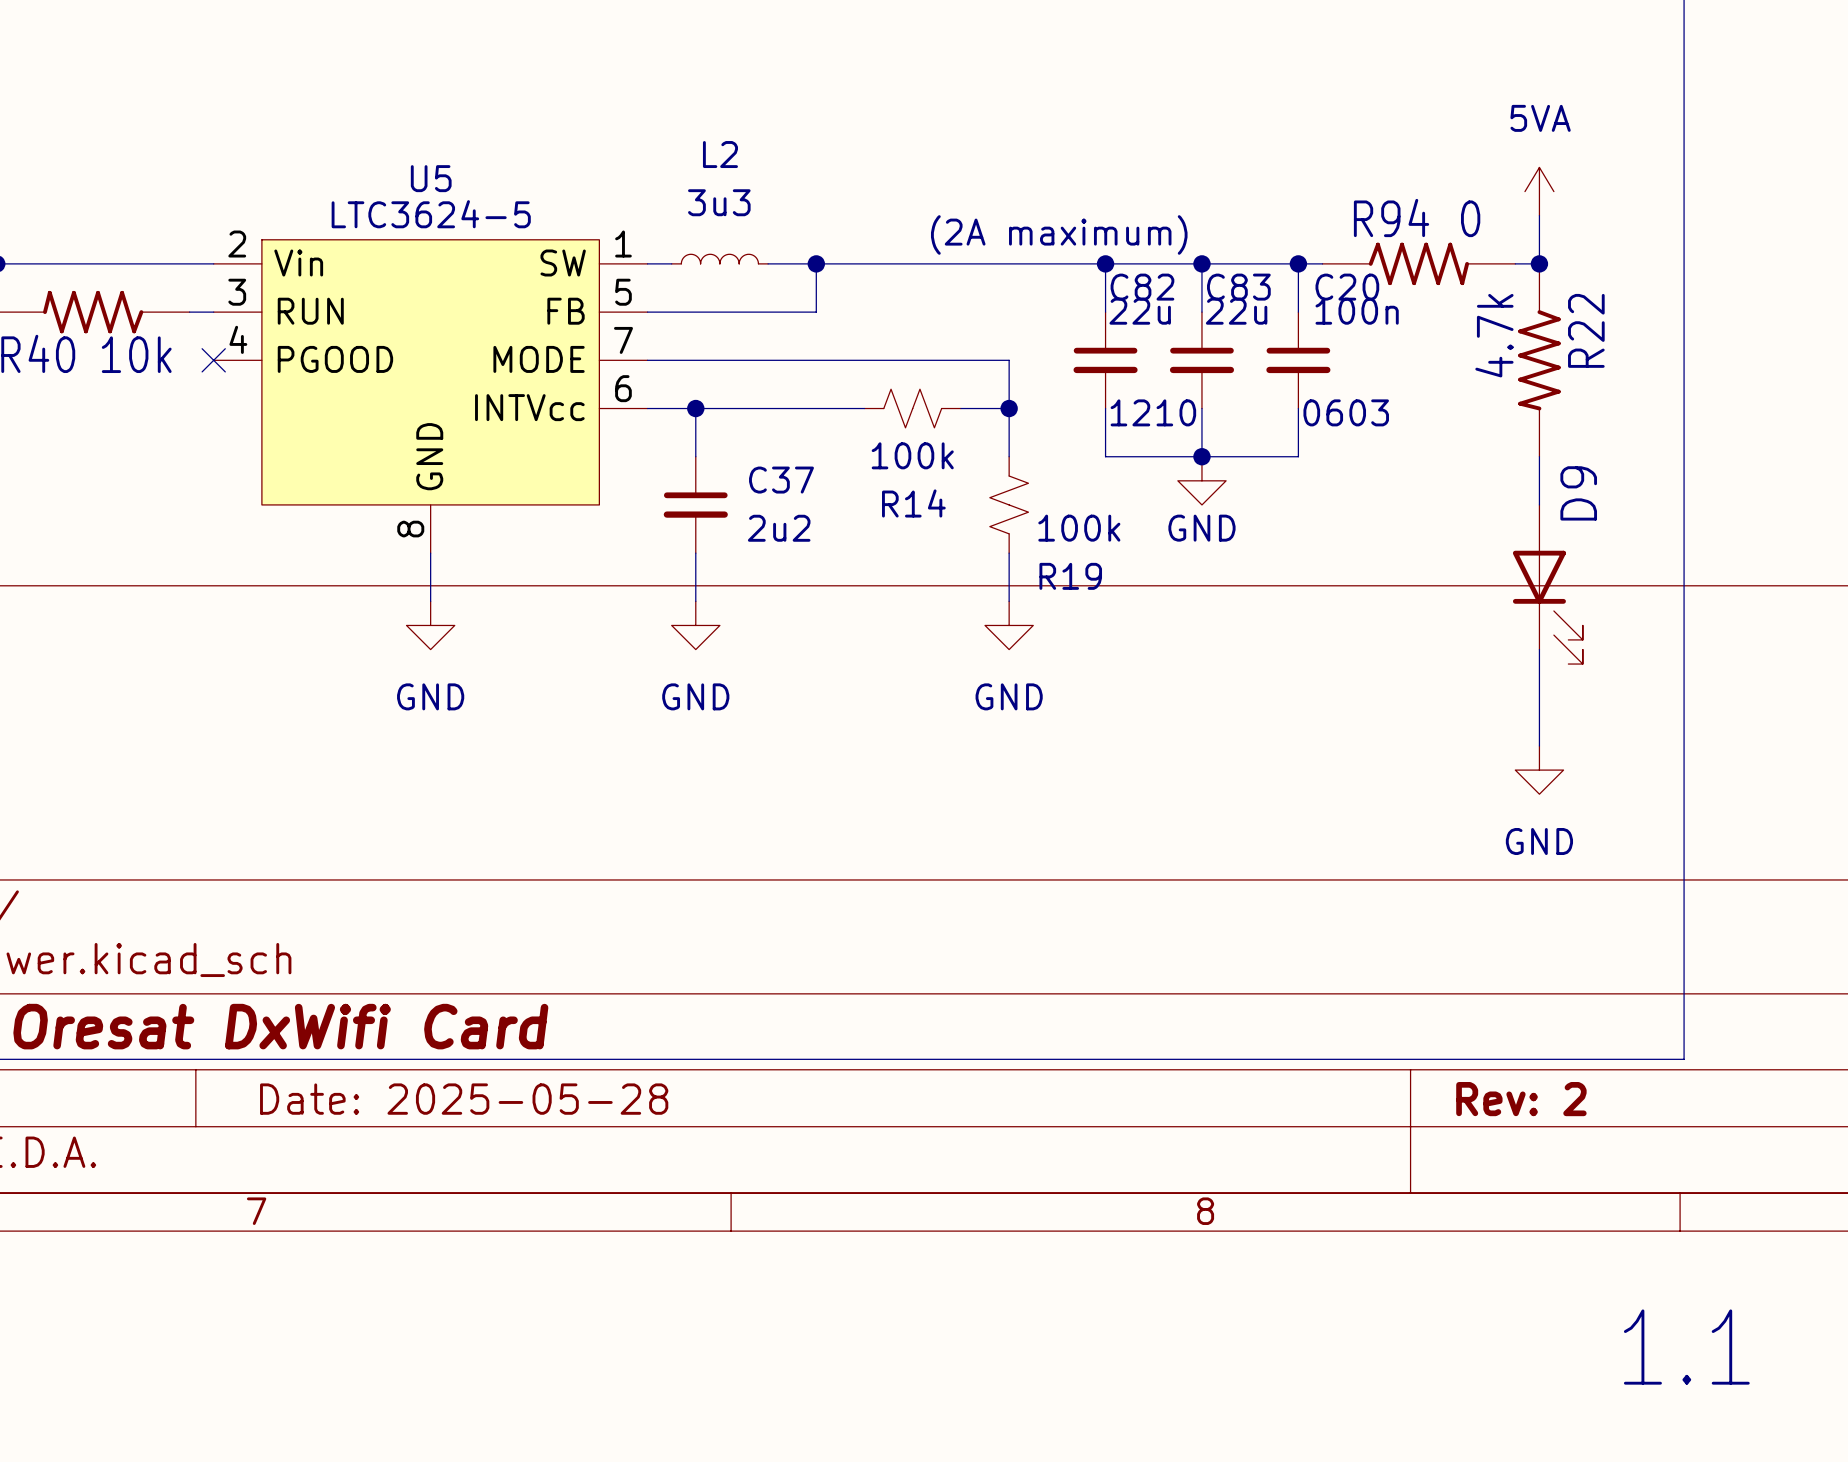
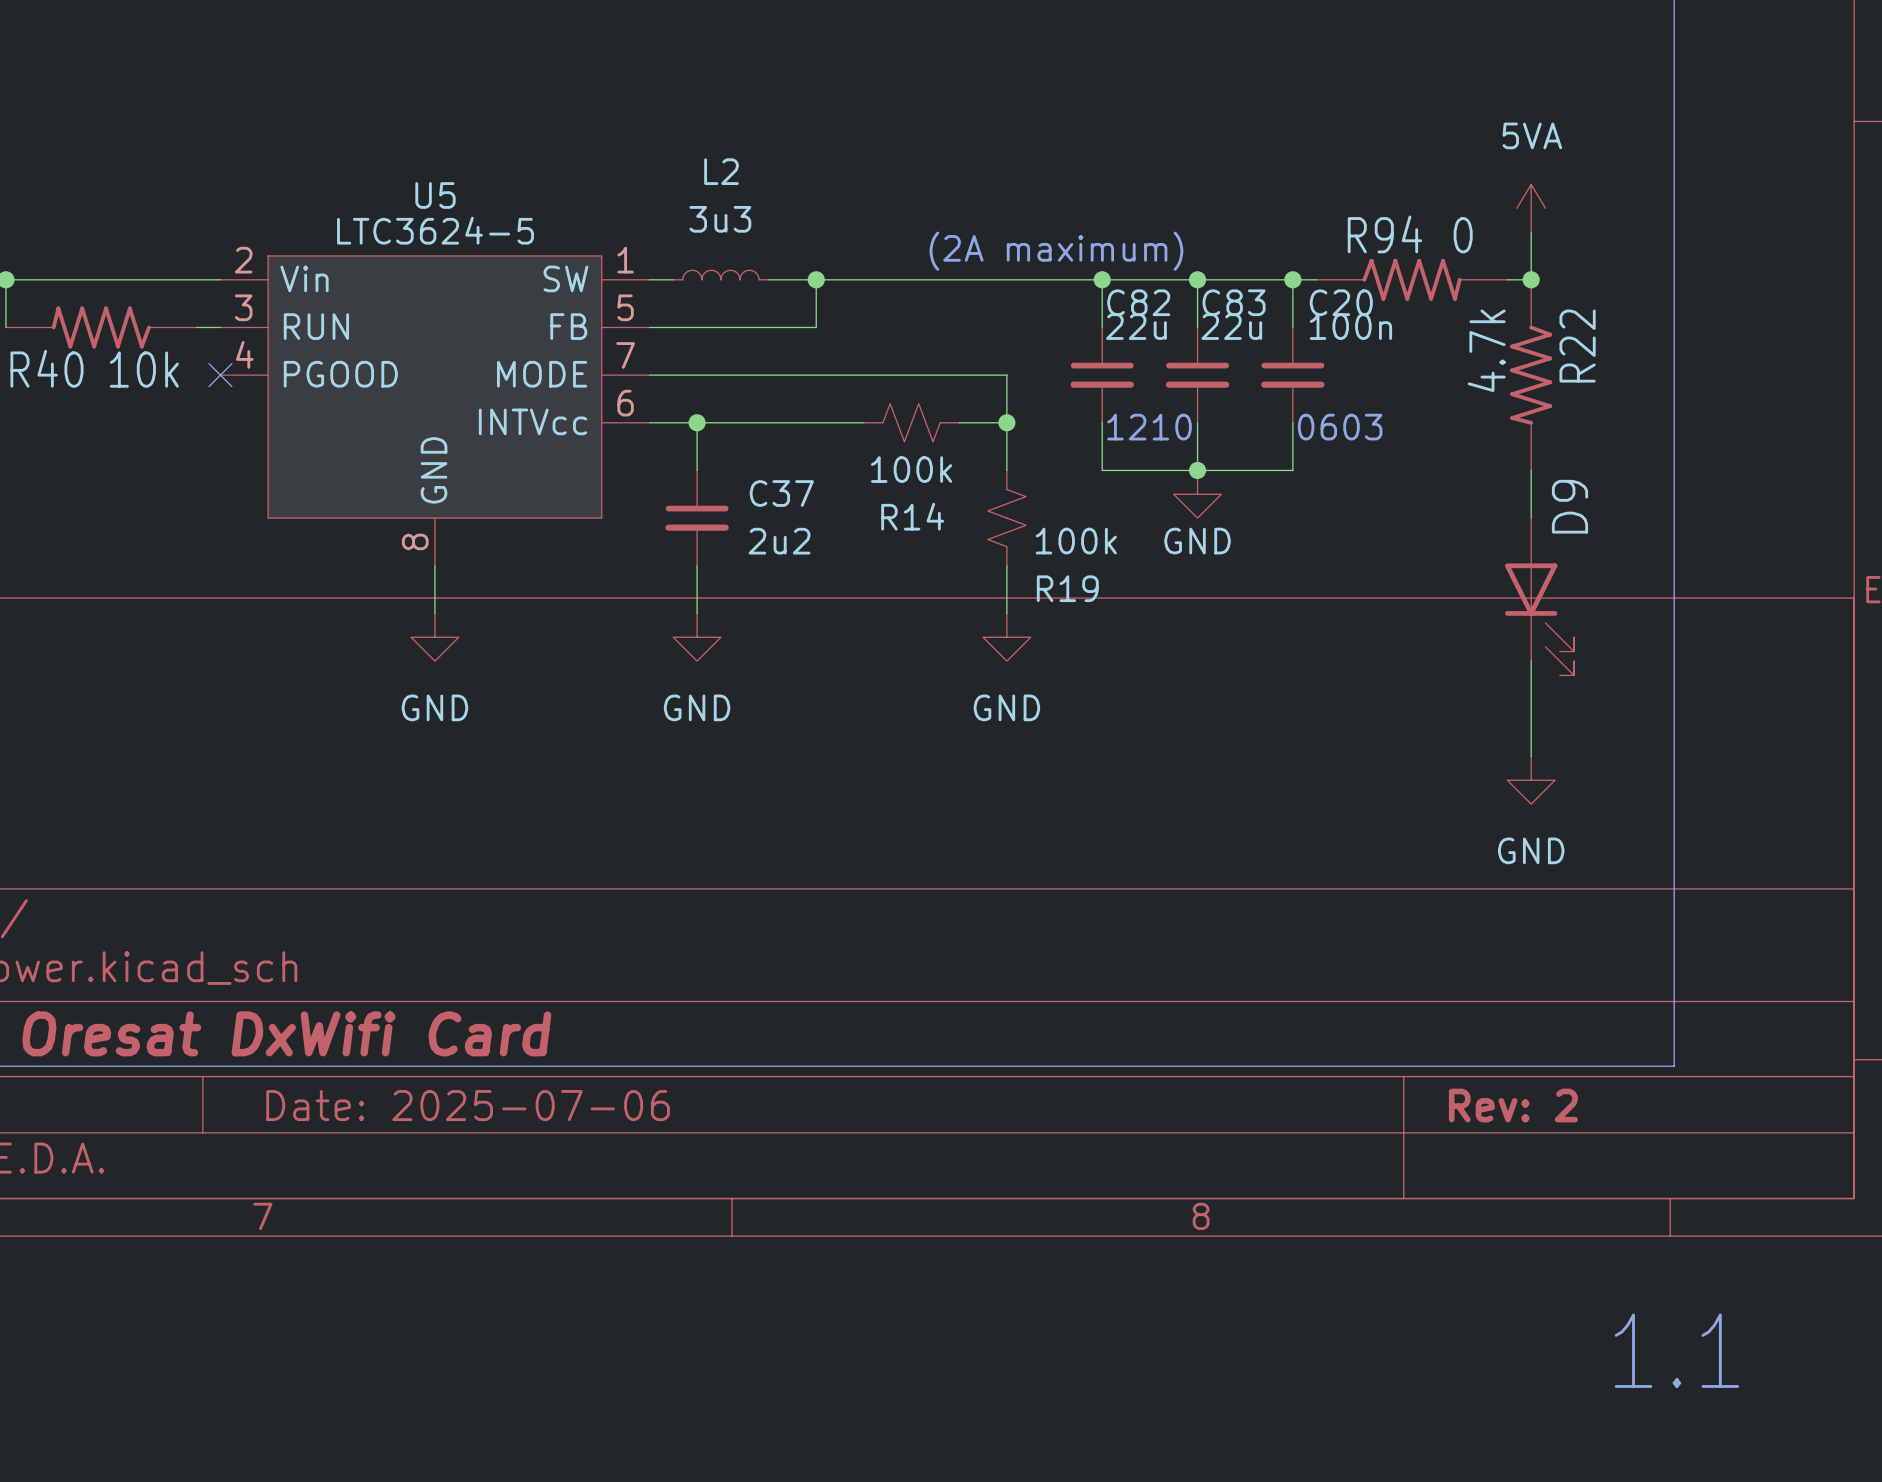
title block: Date: 2025-05-28 (464, 1099) -> Date: 2025-07-06 (468, 1105)

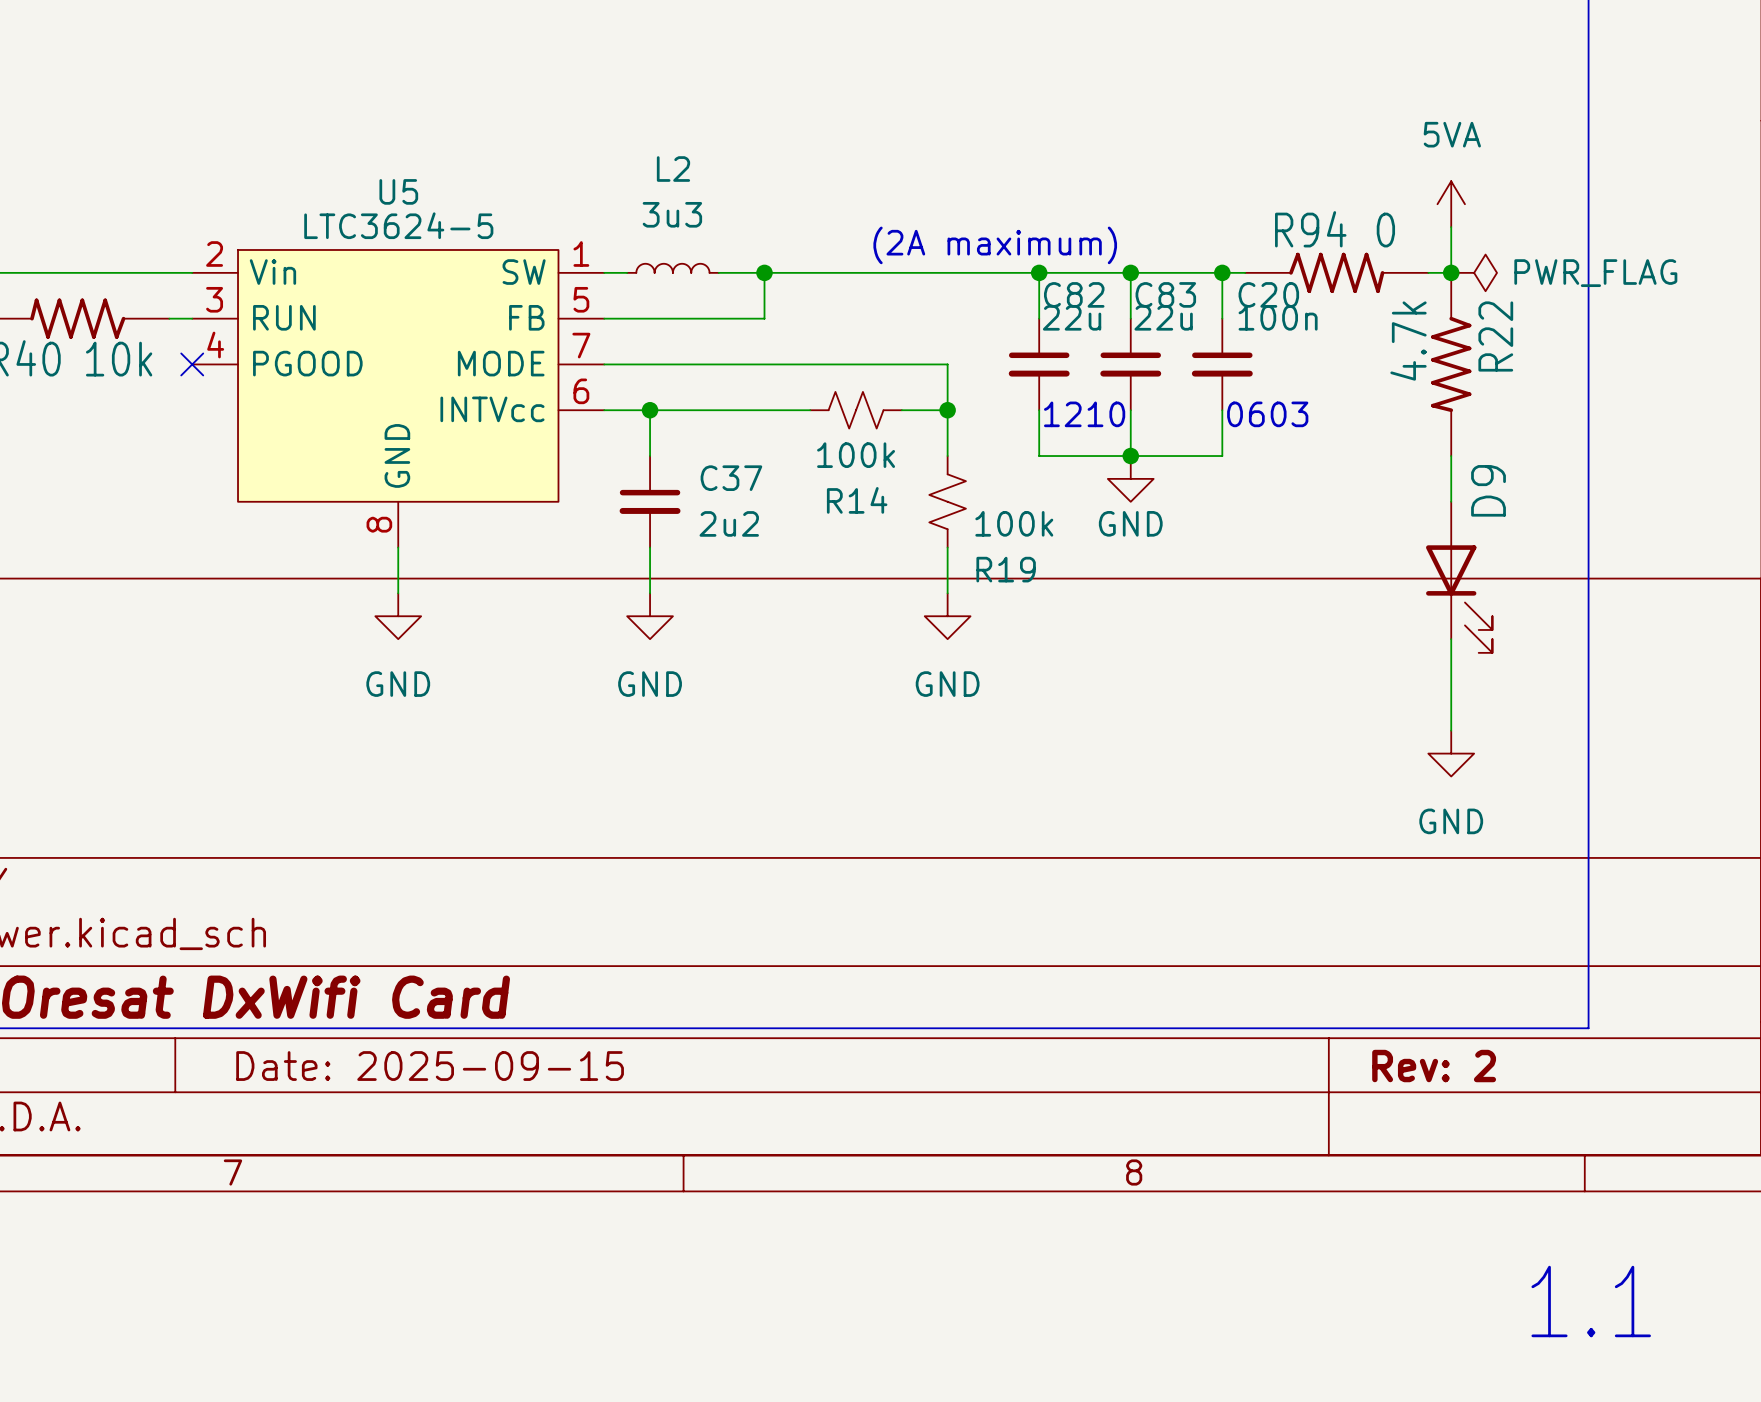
power symbol: none -> PWR_FLAG (1474, 272)
title block: Date: 2025-07-06 (468, 1105) -> Date: 2025-09-15 (430, 1066)

